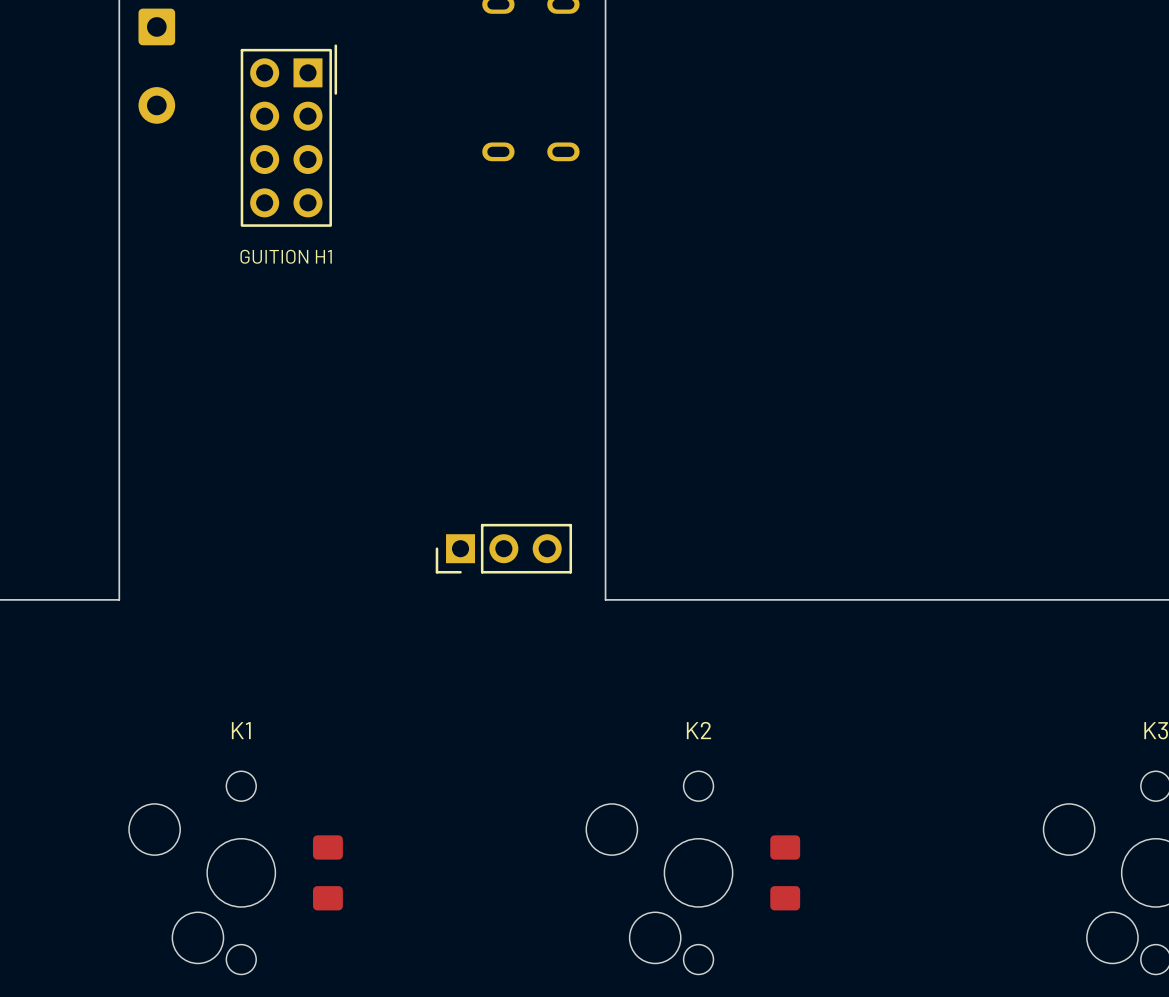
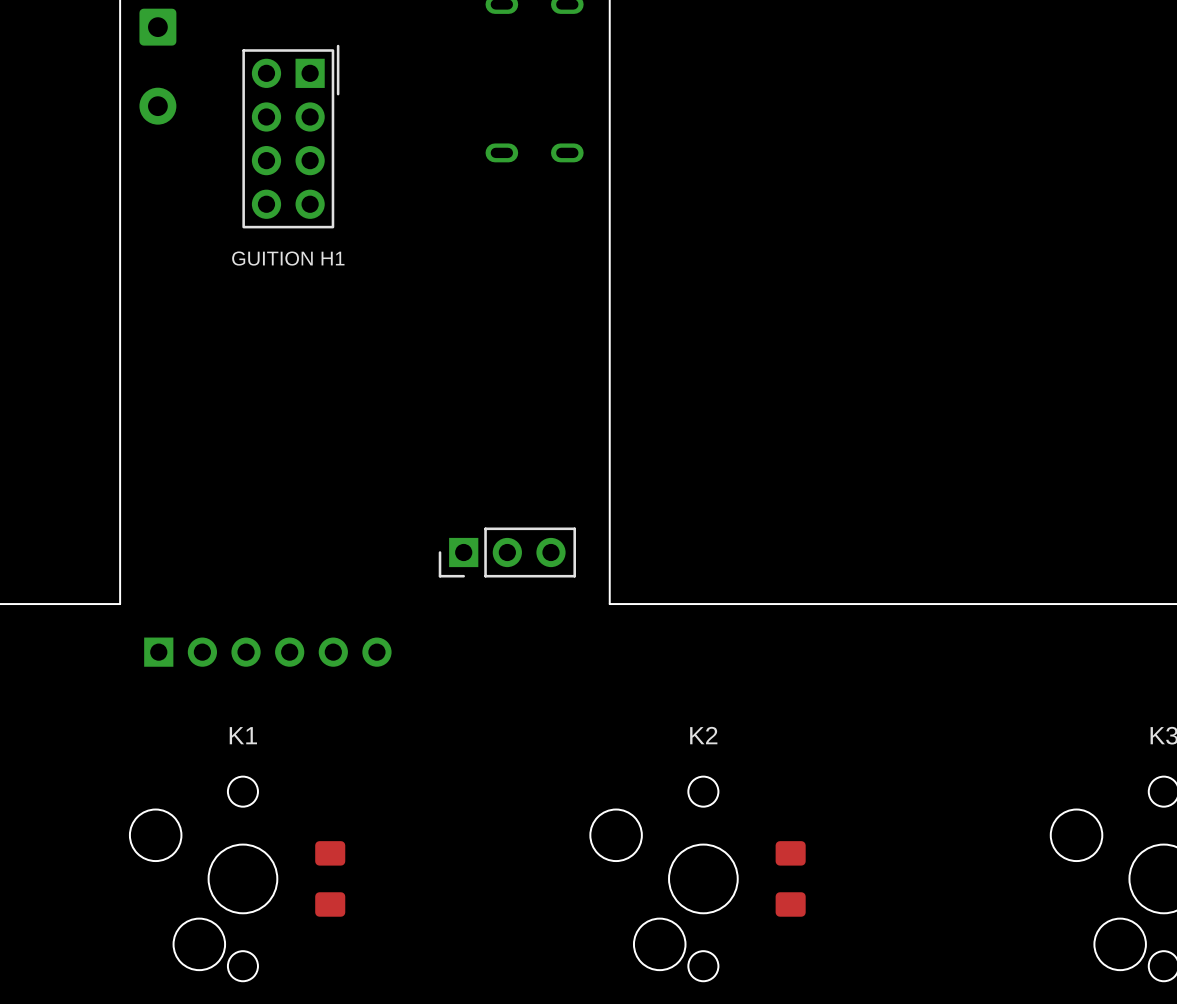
part: none -> (267, 652)

